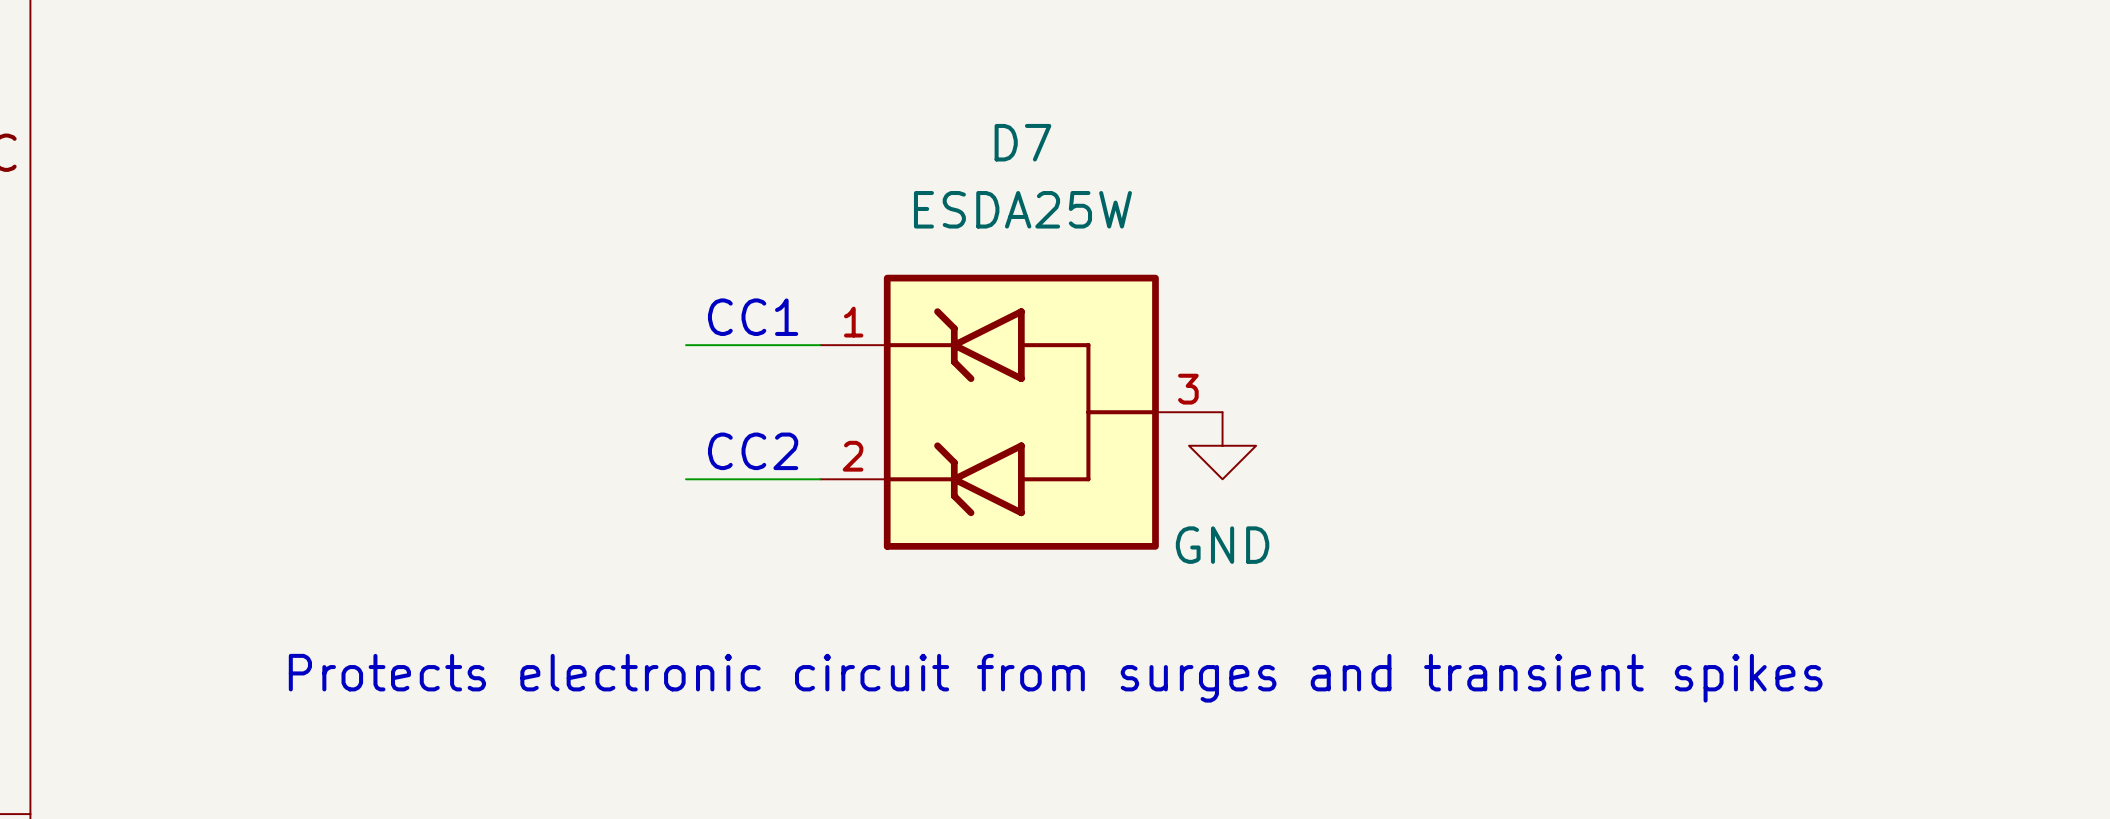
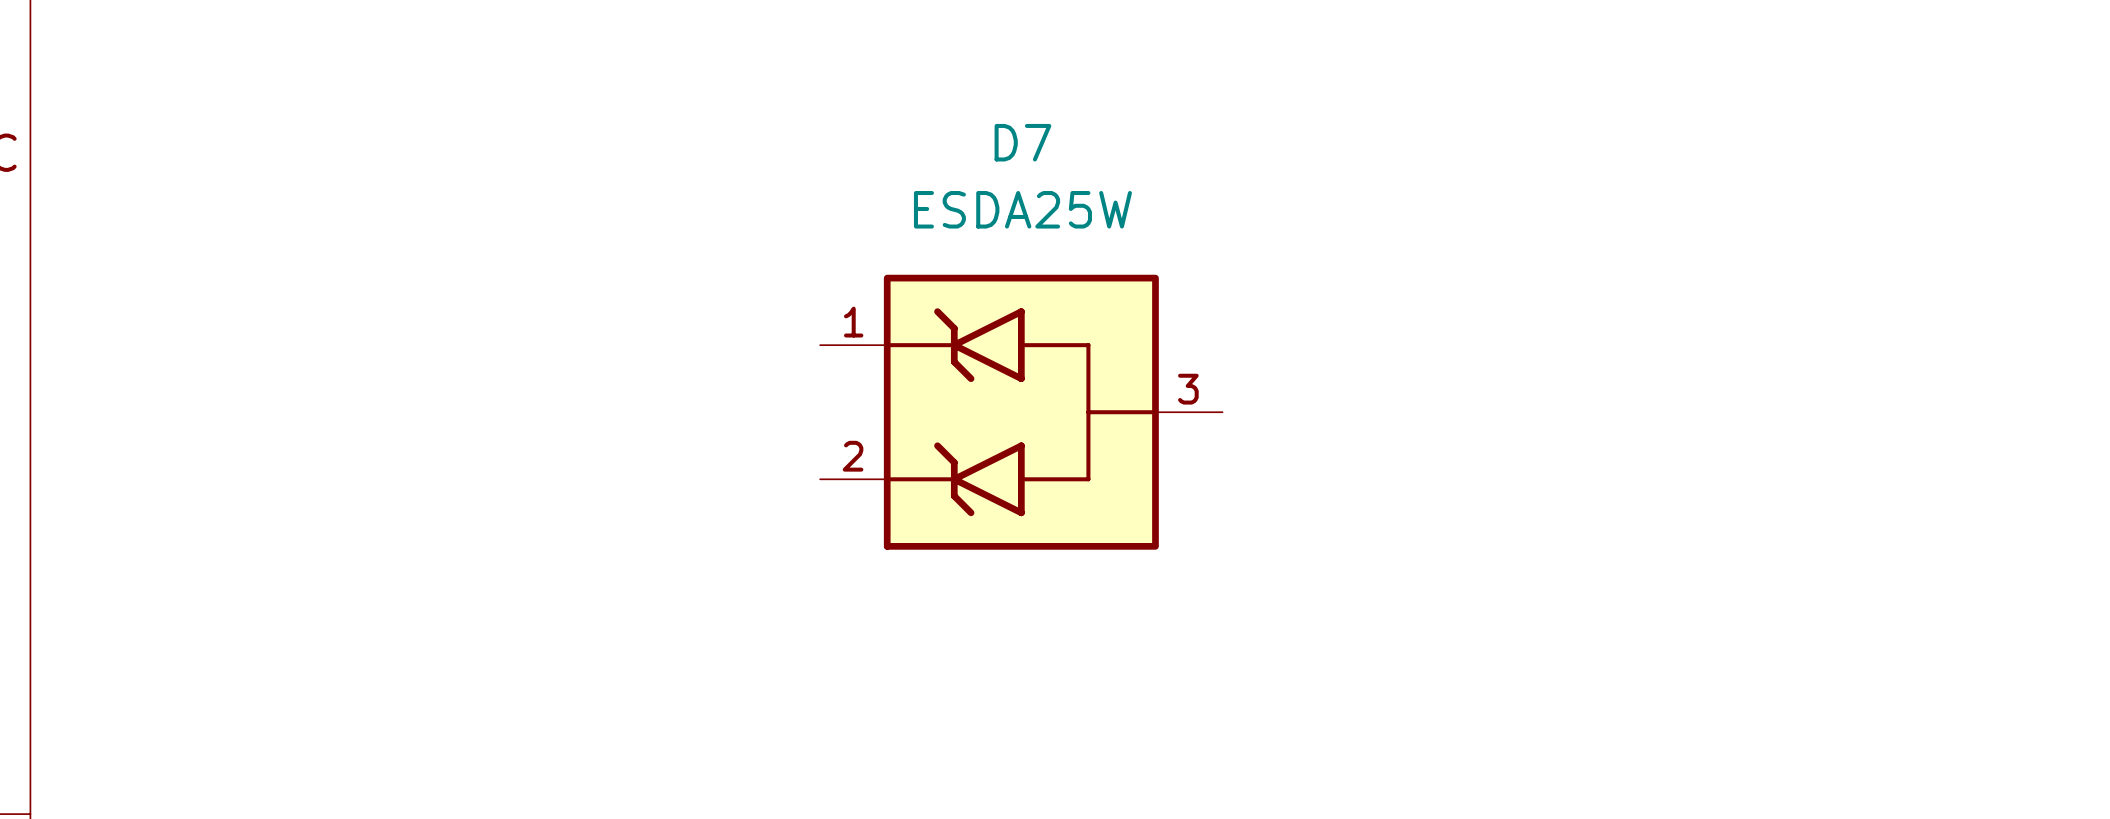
text: CC1 (753, 317) -> none
wire: (686, 345) (820, 345) -> none
power symbol: GND (1222, 445) -> none
text: CC2 (753, 451) -> none
wire: (686, 479) (820, 479) -> none
text: Protects electronic circuit from surges and transient spikes (1055, 678) -> none

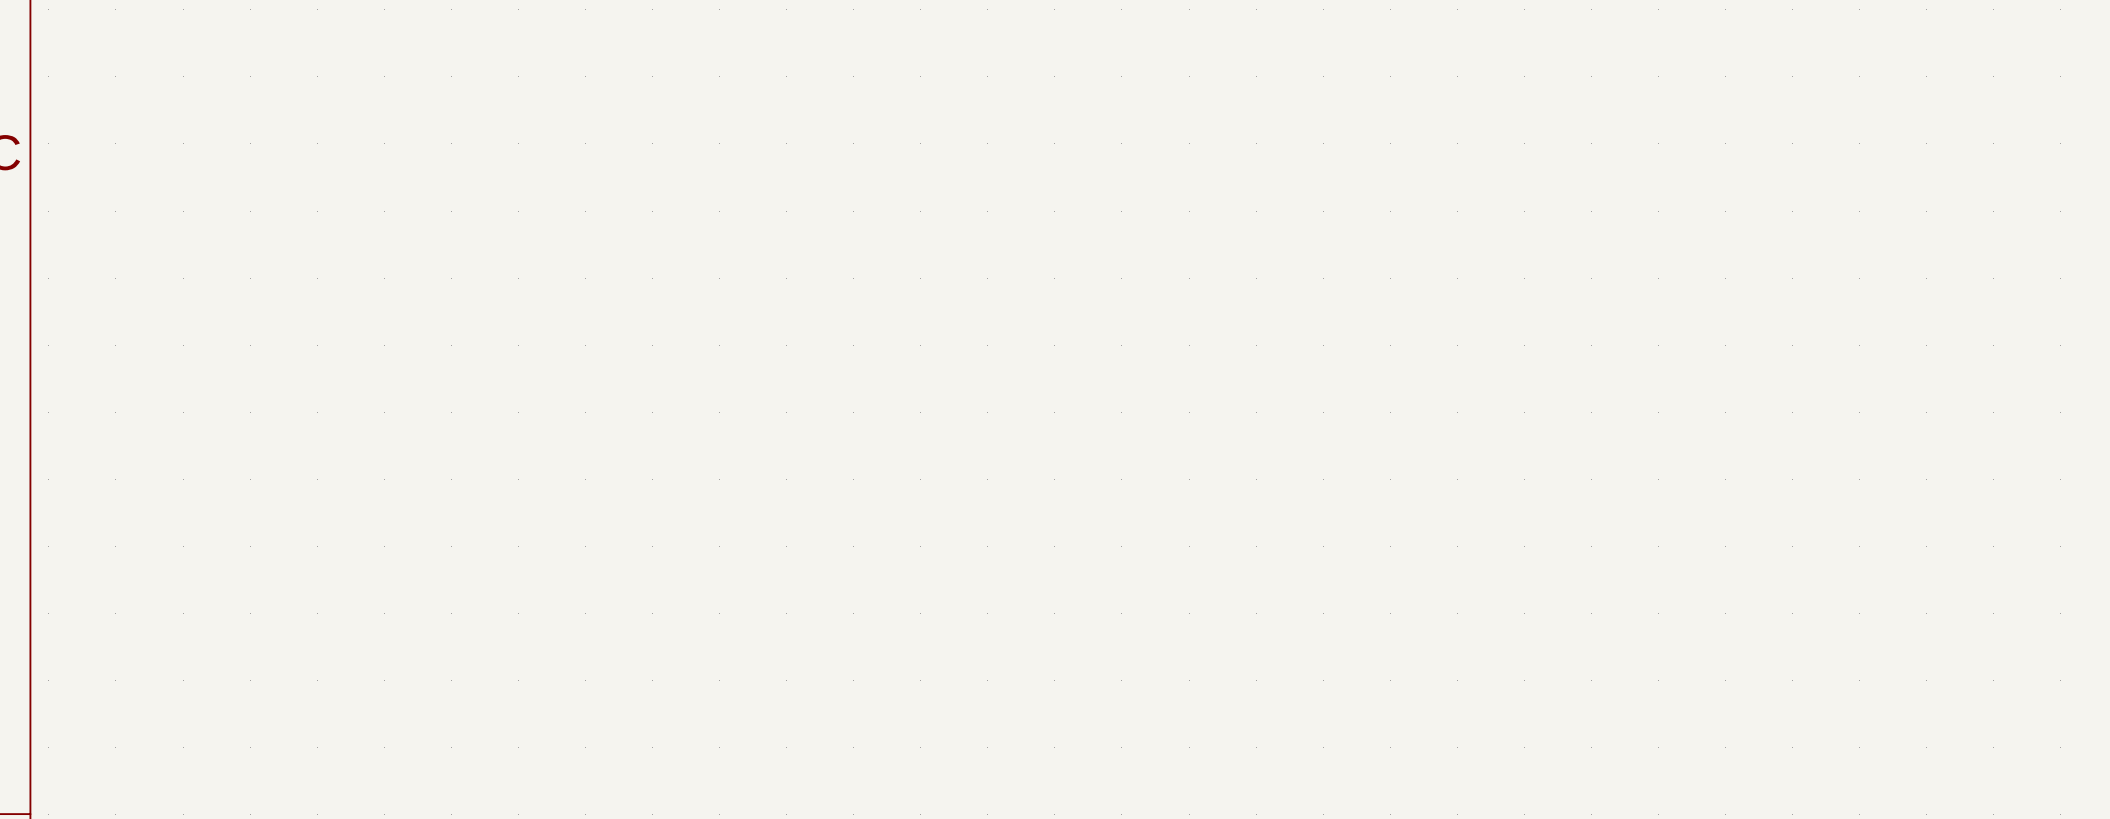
D7: ESDA25W (1021, 412) -> none

